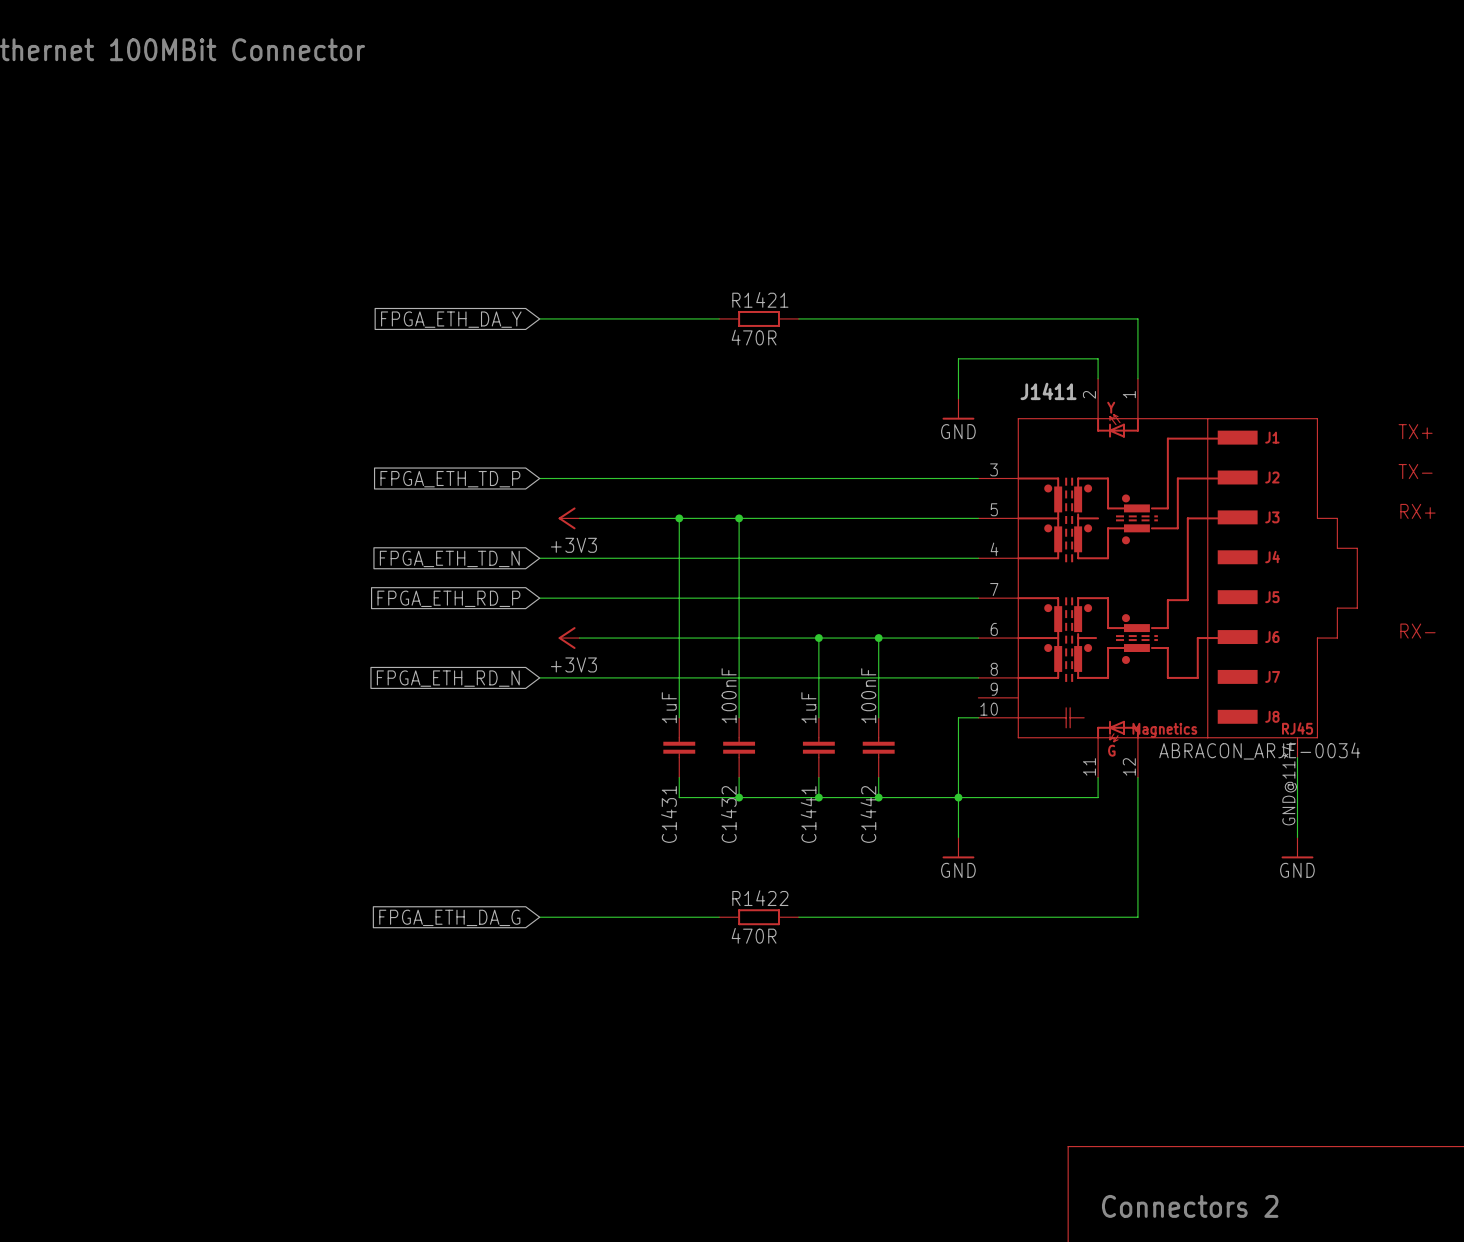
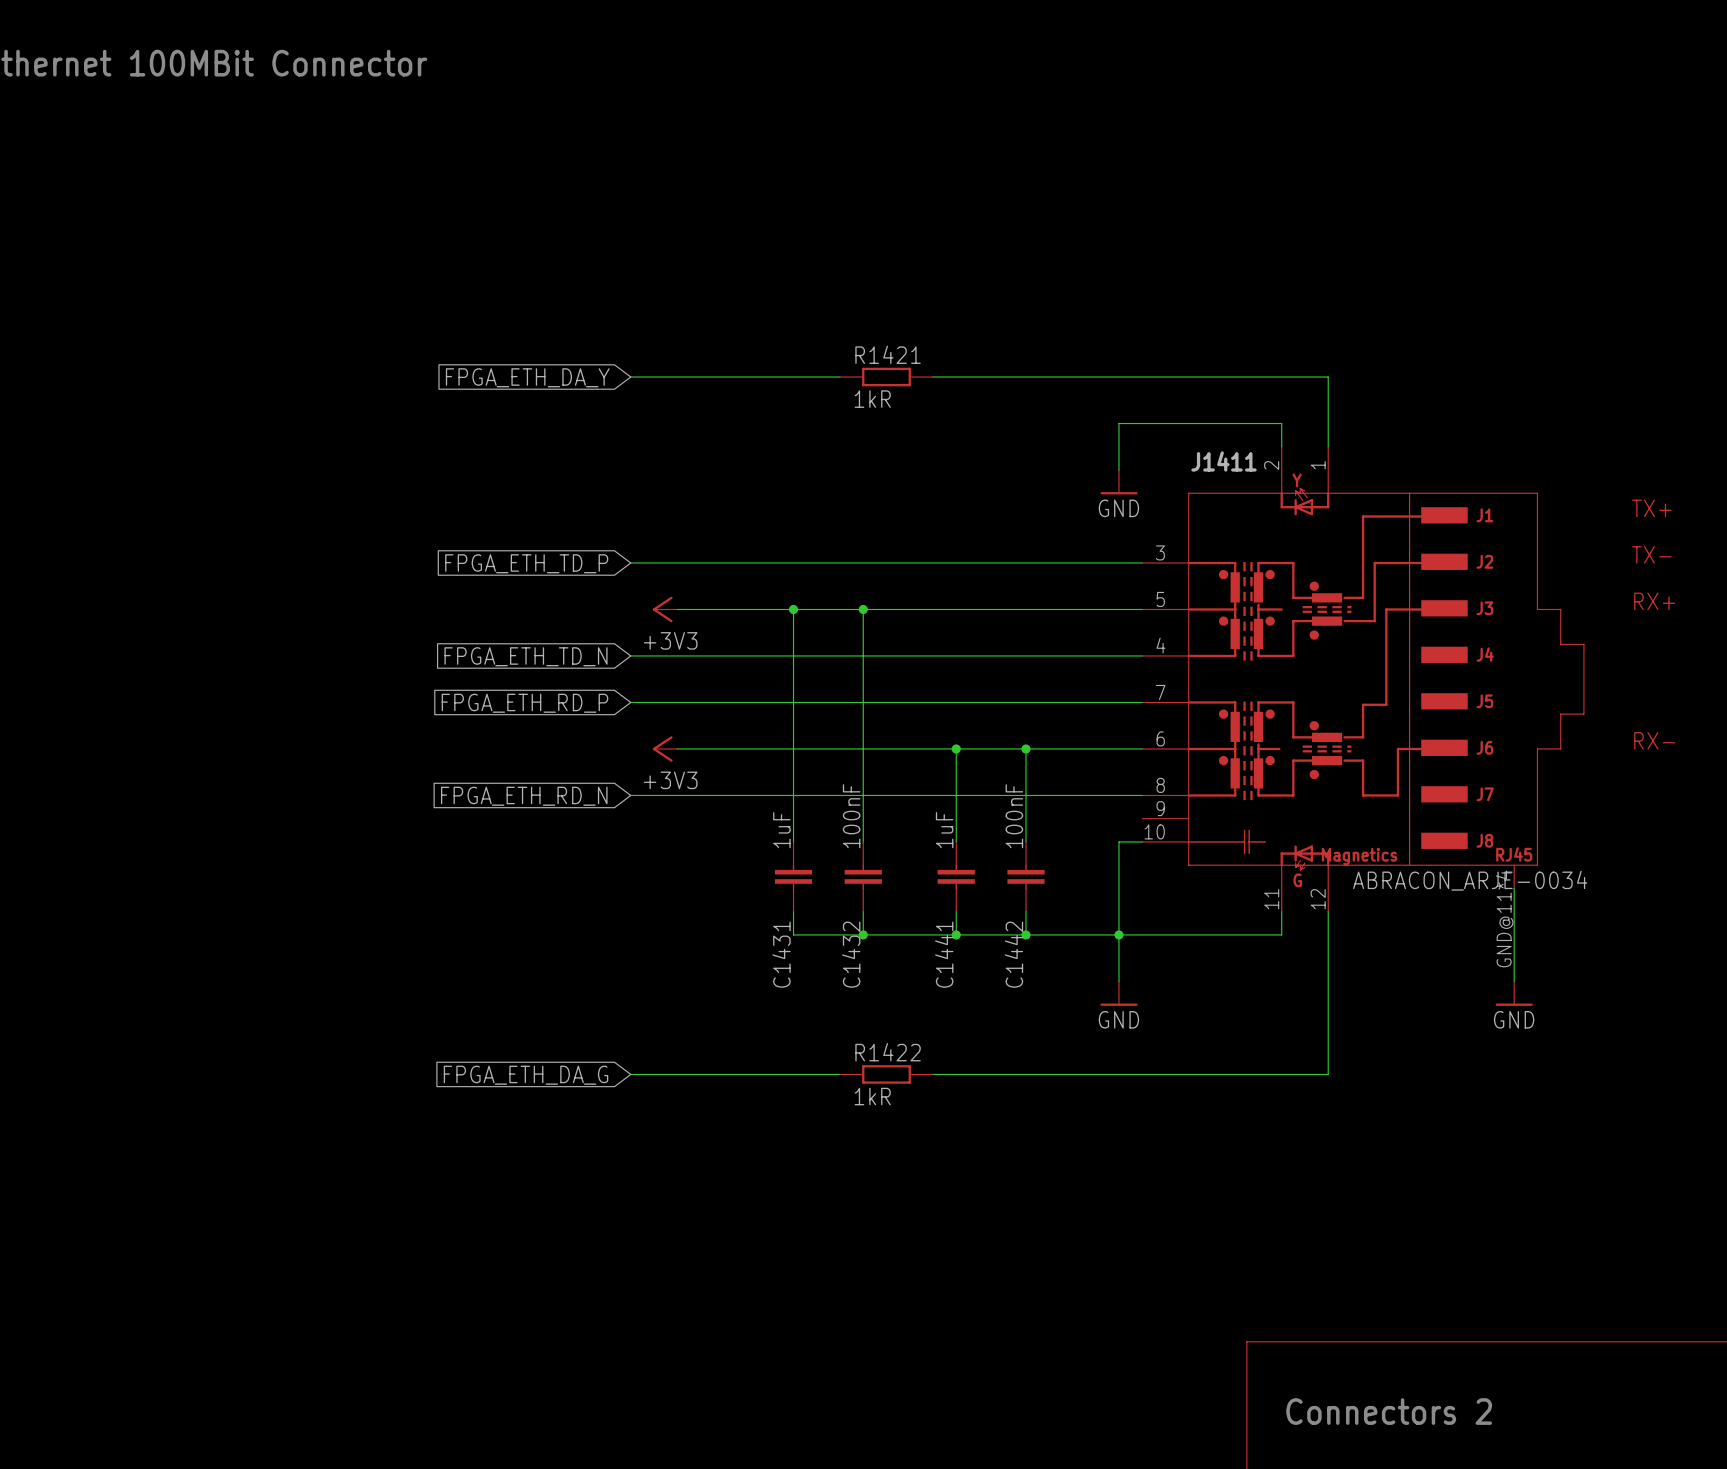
R1421 value: 470R (754, 337) -> 1kR (872, 399)
R1422 value: 470R (754, 935) -> 1kR (872, 1096)

